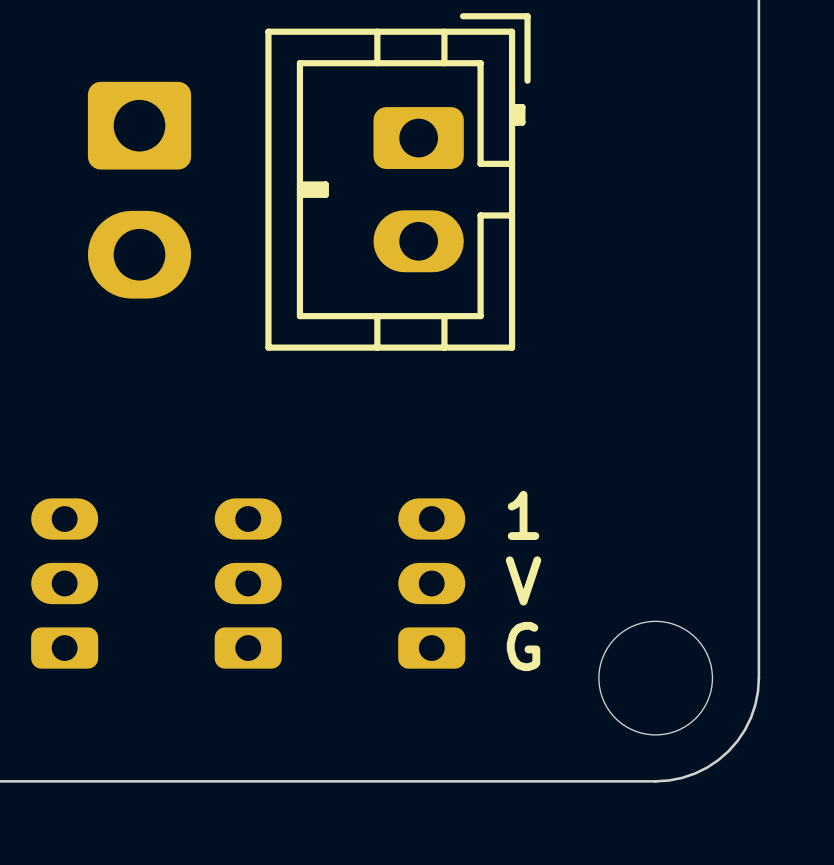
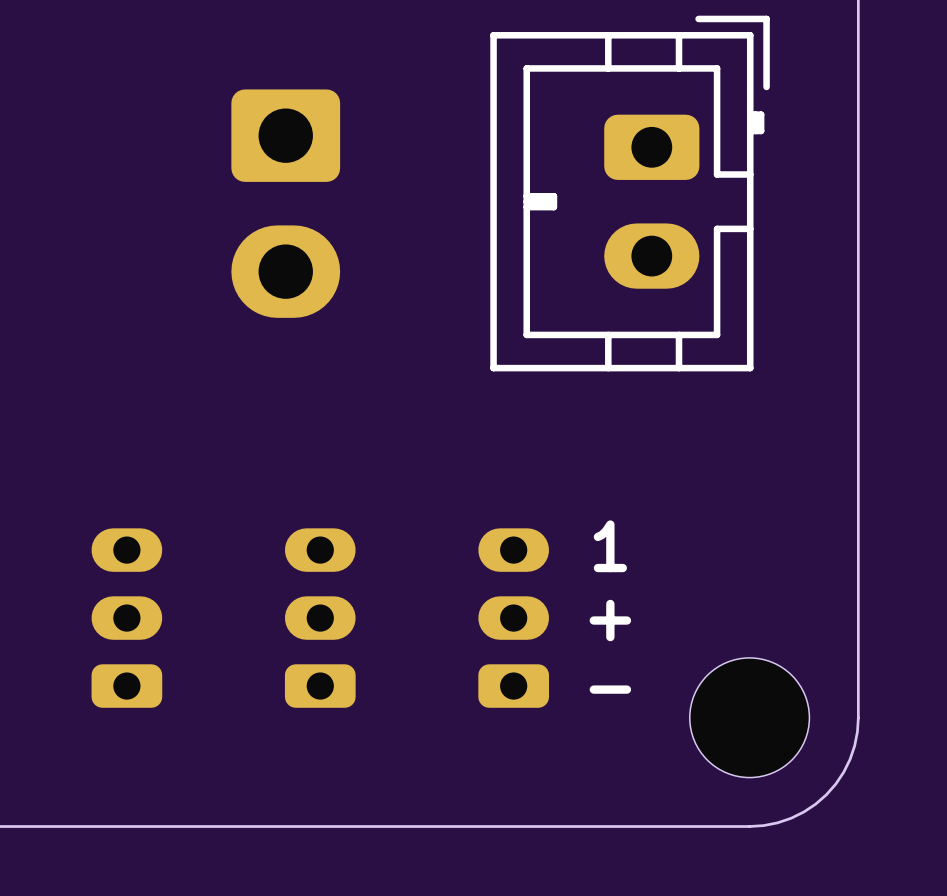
part position: (398, 181) -> (630, 193)
part position: (139, 190) -> (285, 203)
text: V (523, 580) -> + (610, 620)
text: G (523, 646) -> - (610, 689)

